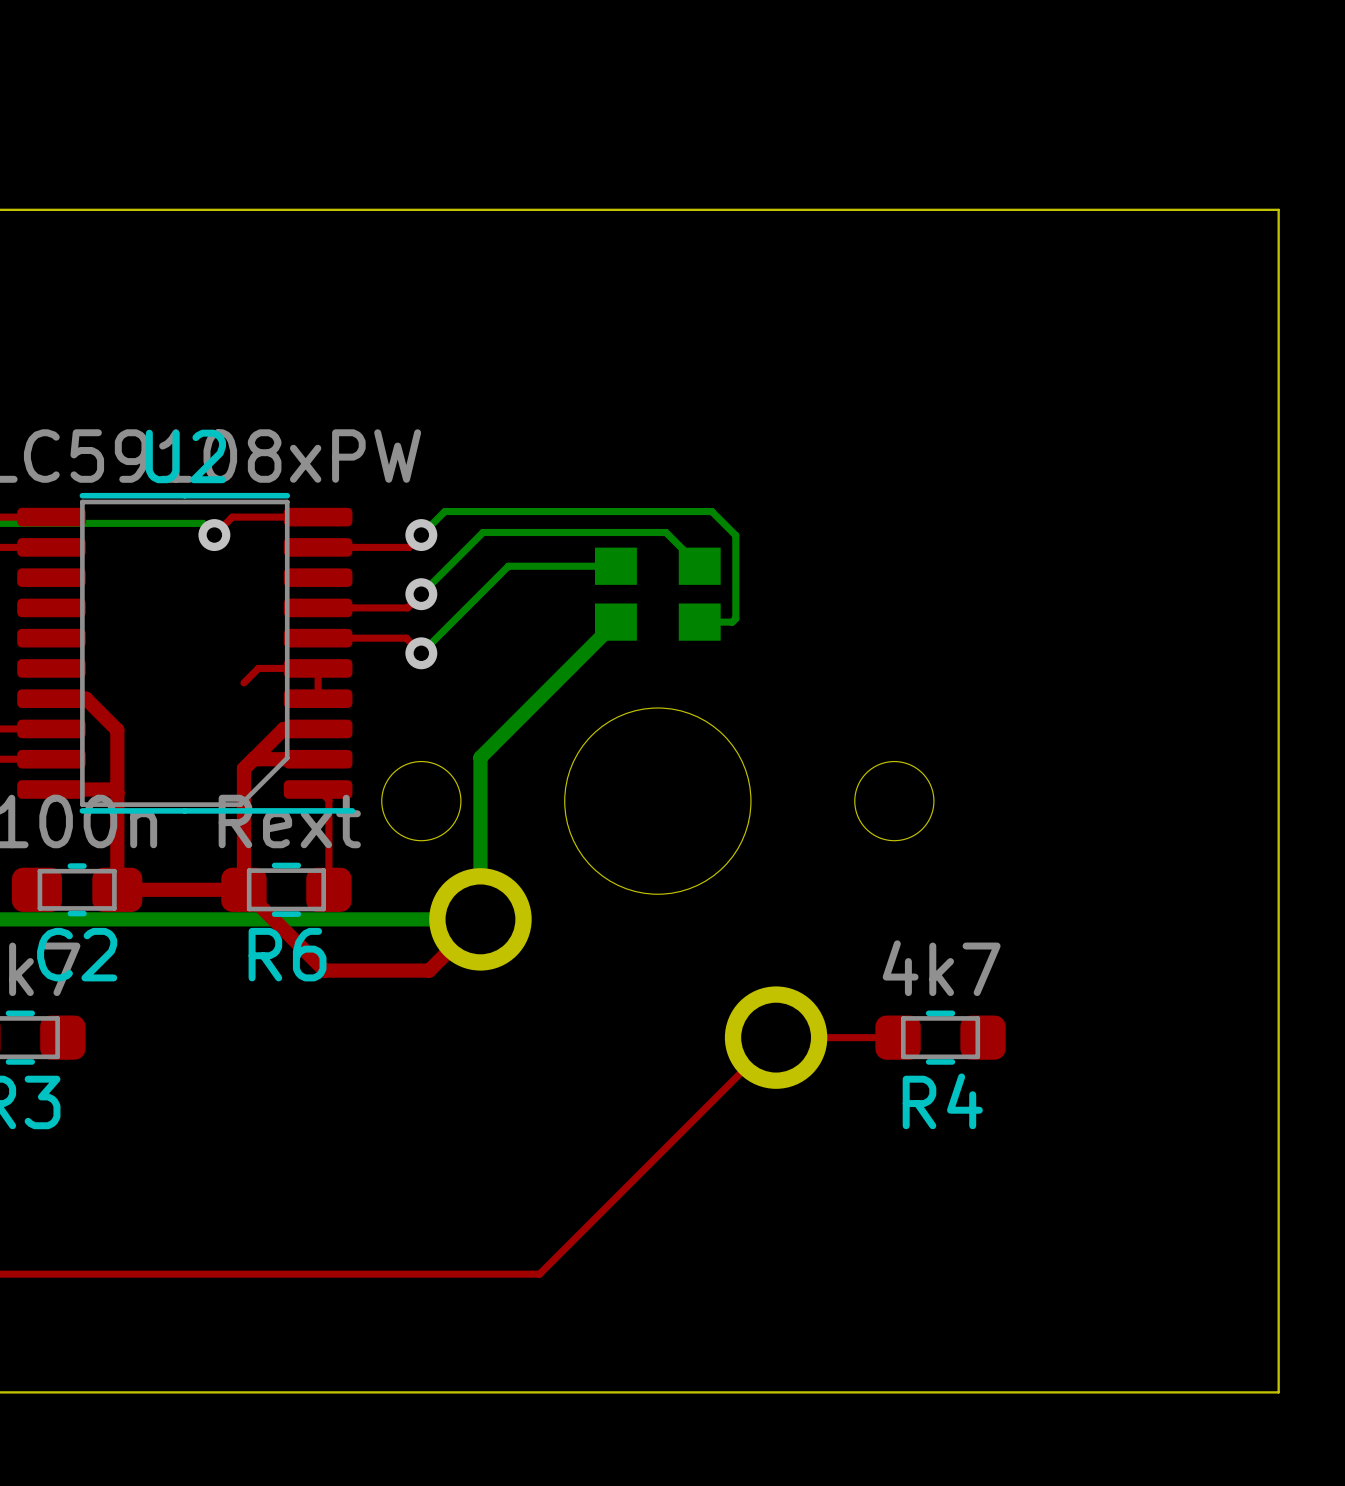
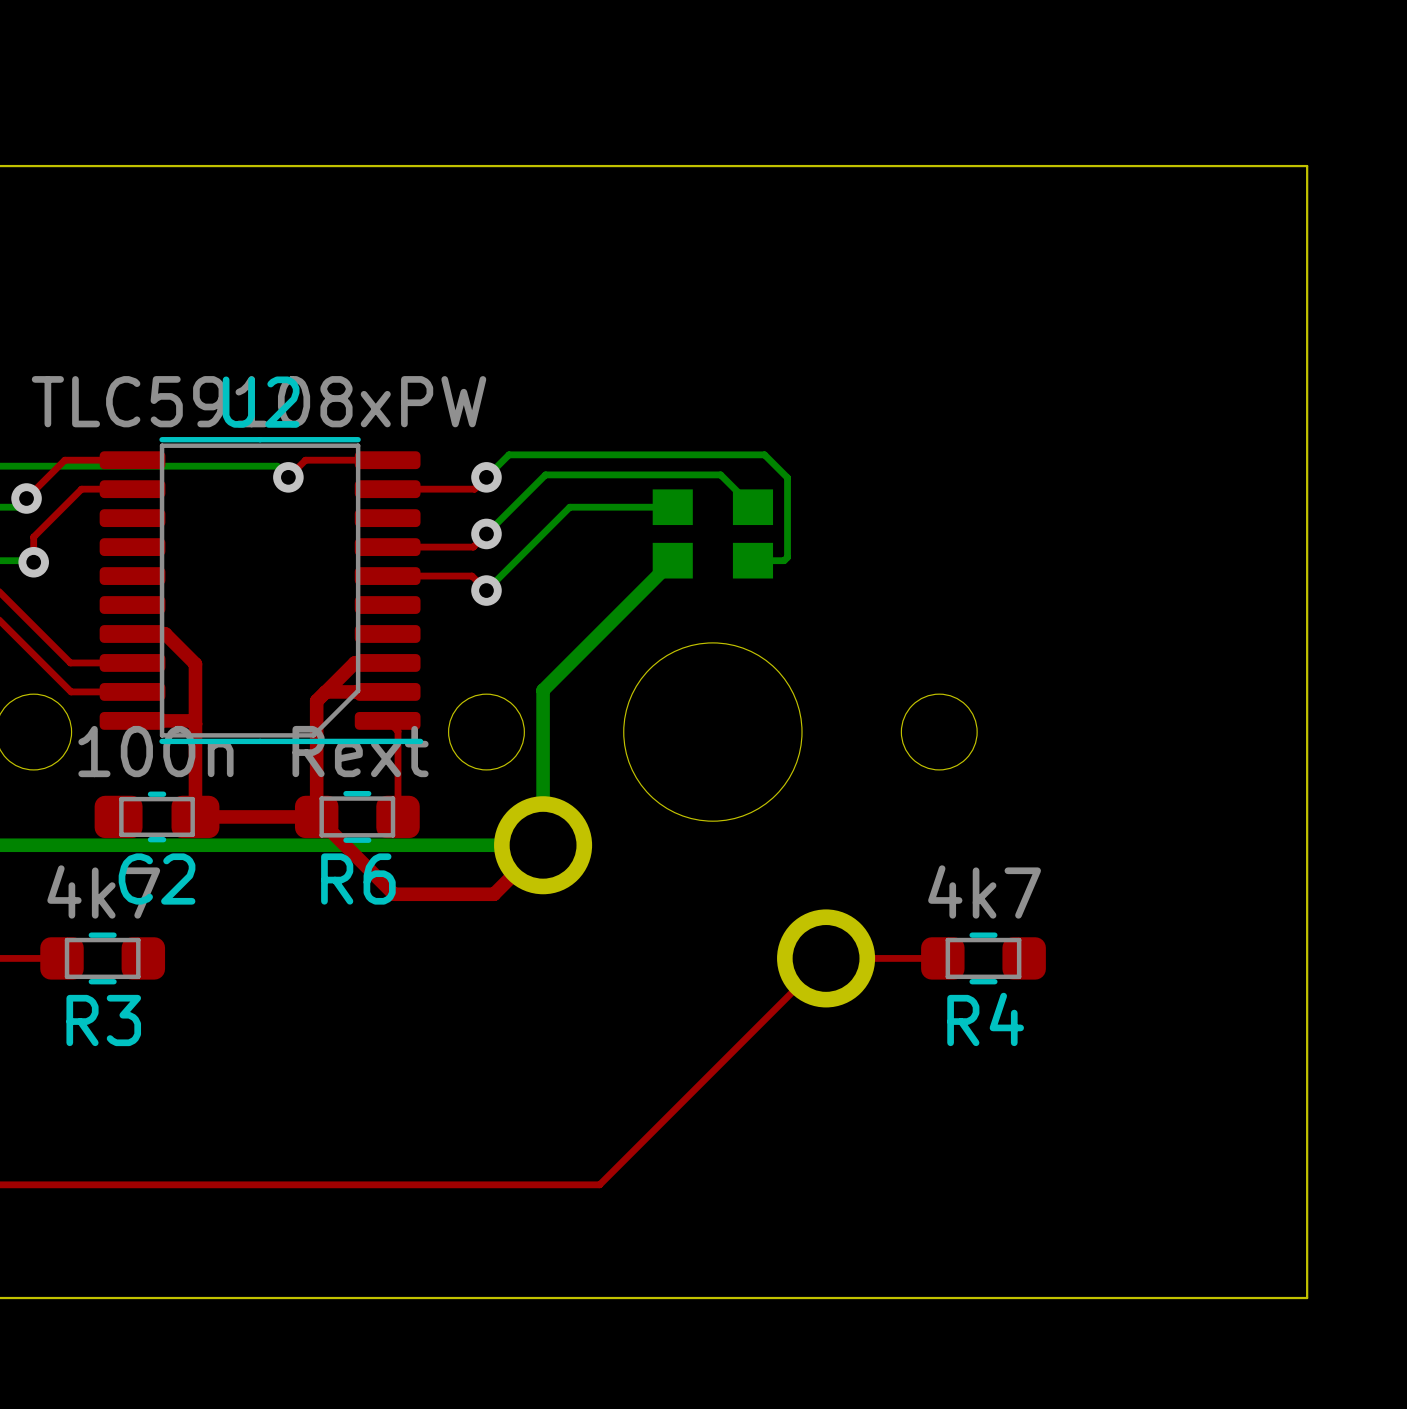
top track: (243, 682) (258, 668) (318, 668) (318, 698) -> none

